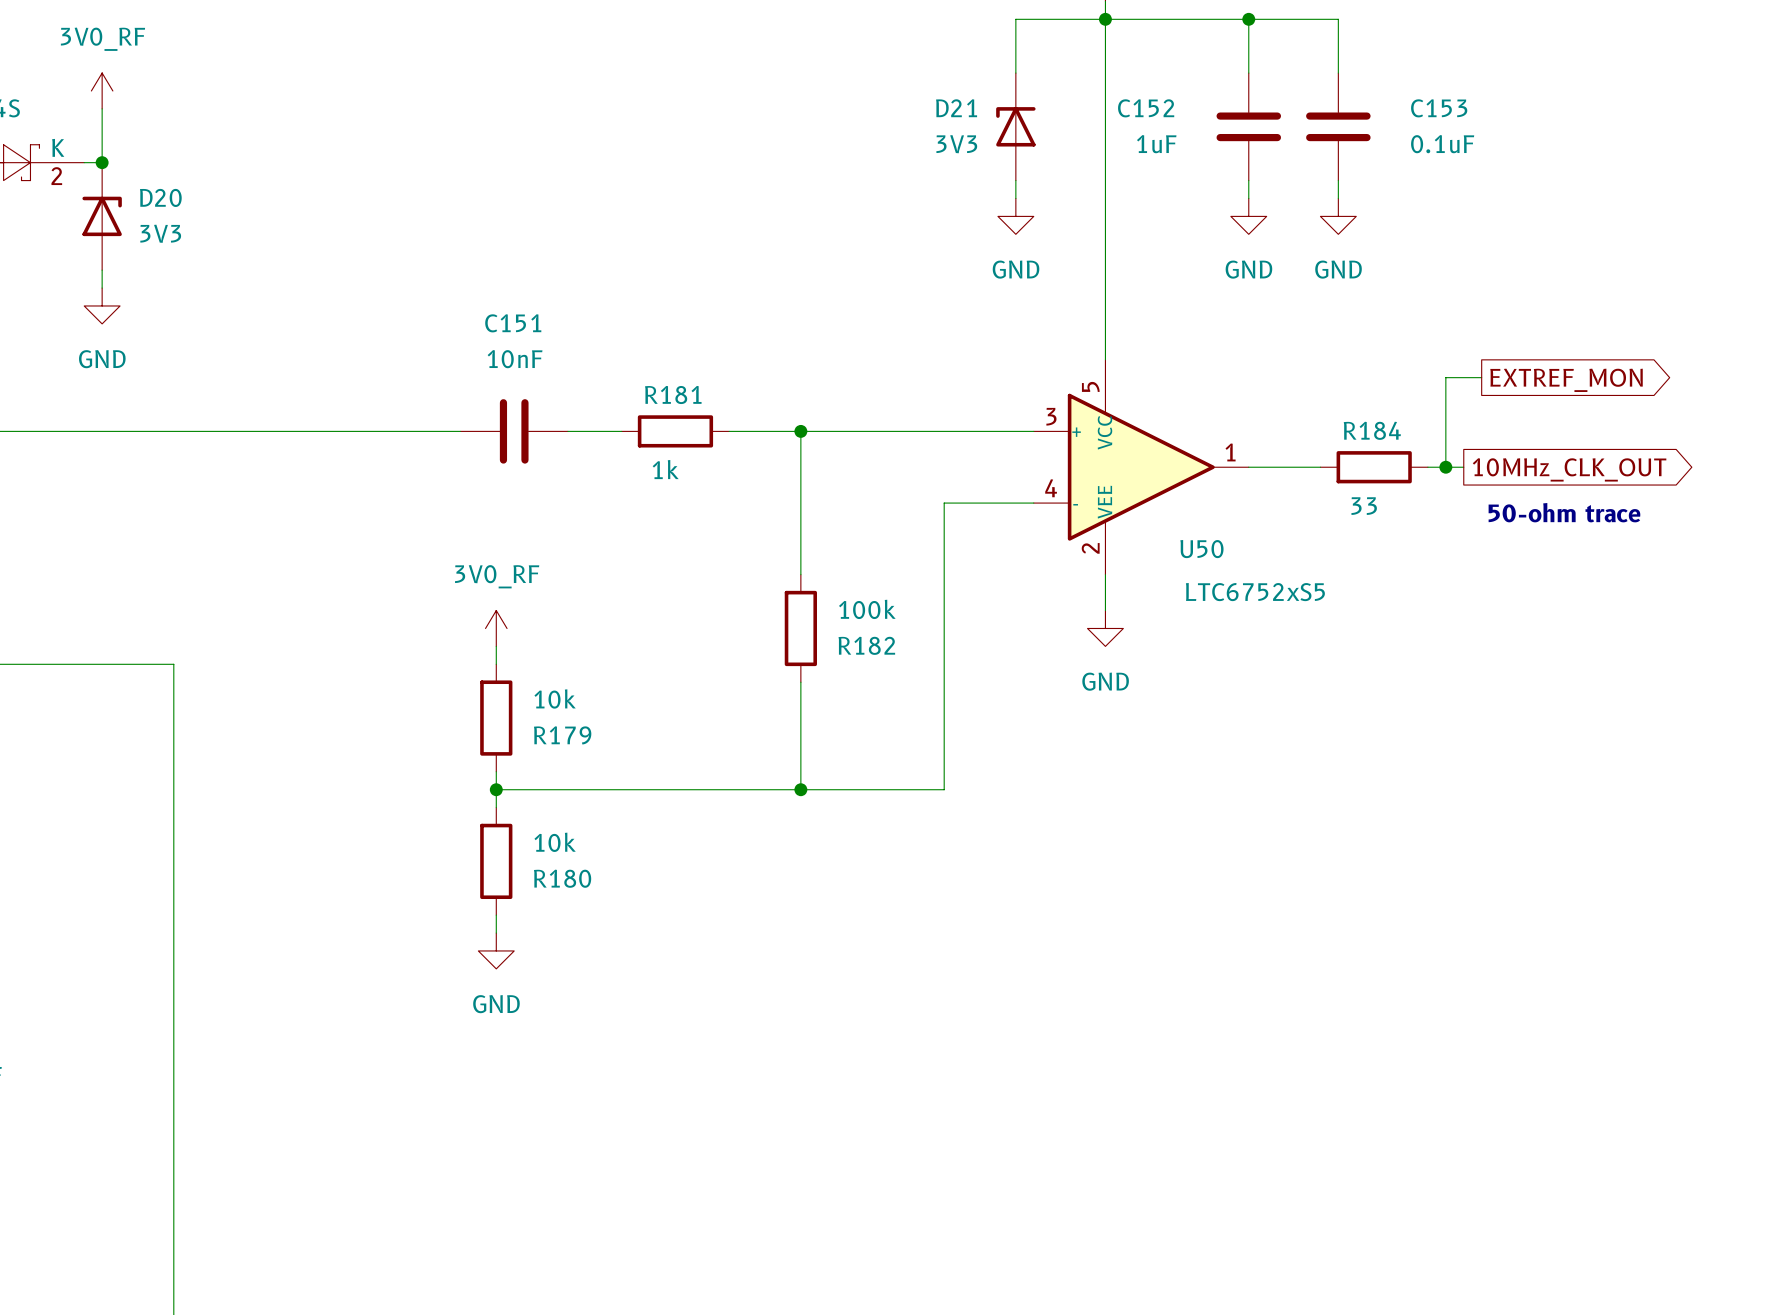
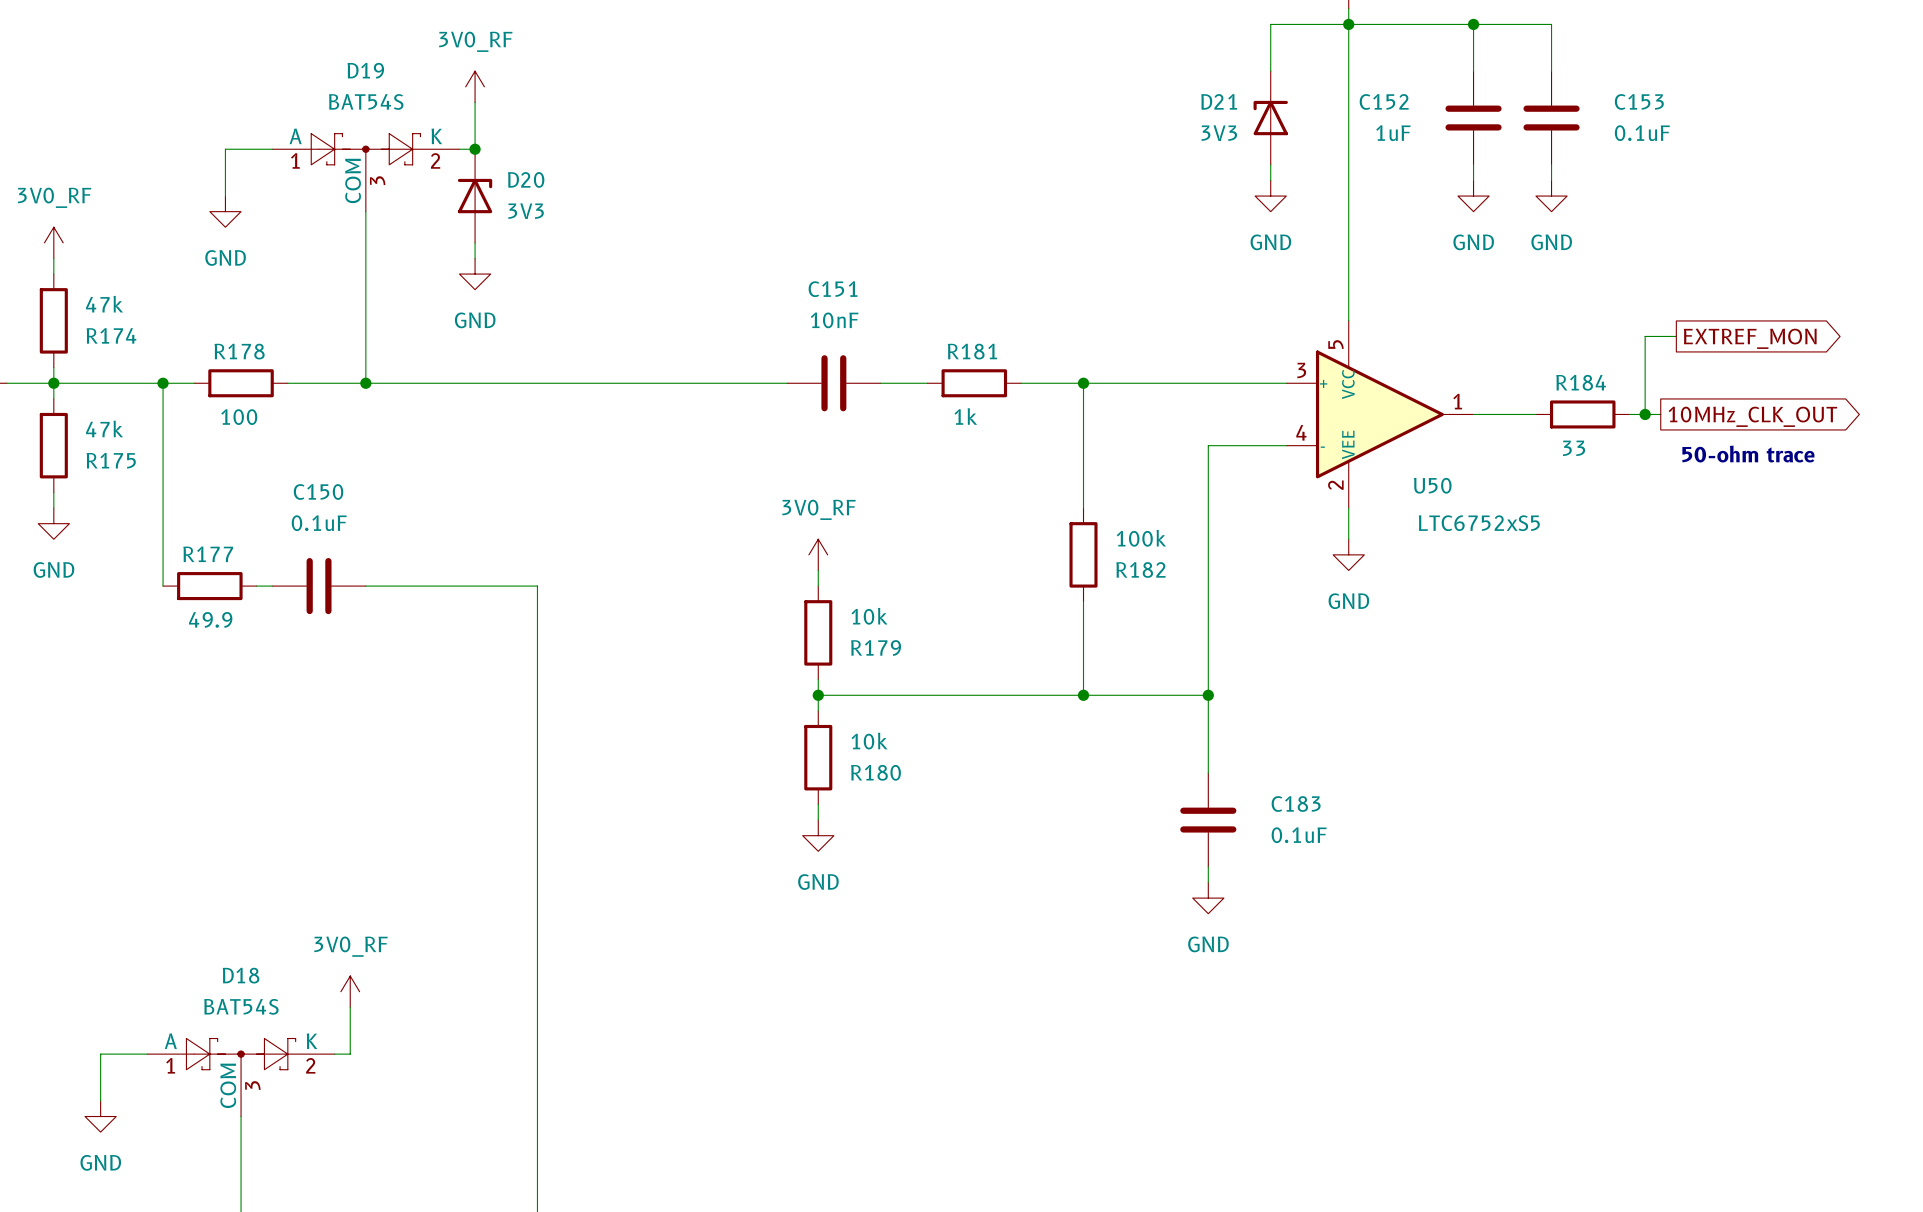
wire: none -> (1208, 695) (1208, 773)
junction: none -> (1208, 695)
C183: none -> 0.1uF (1208, 820)
wire: none -> (1208, 866) (1208, 882)
power symbol: none -> GND (1208, 898)

